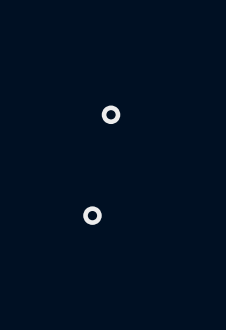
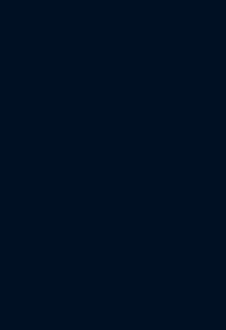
via: (111, 114) -> none
via: (92, 215) -> none

